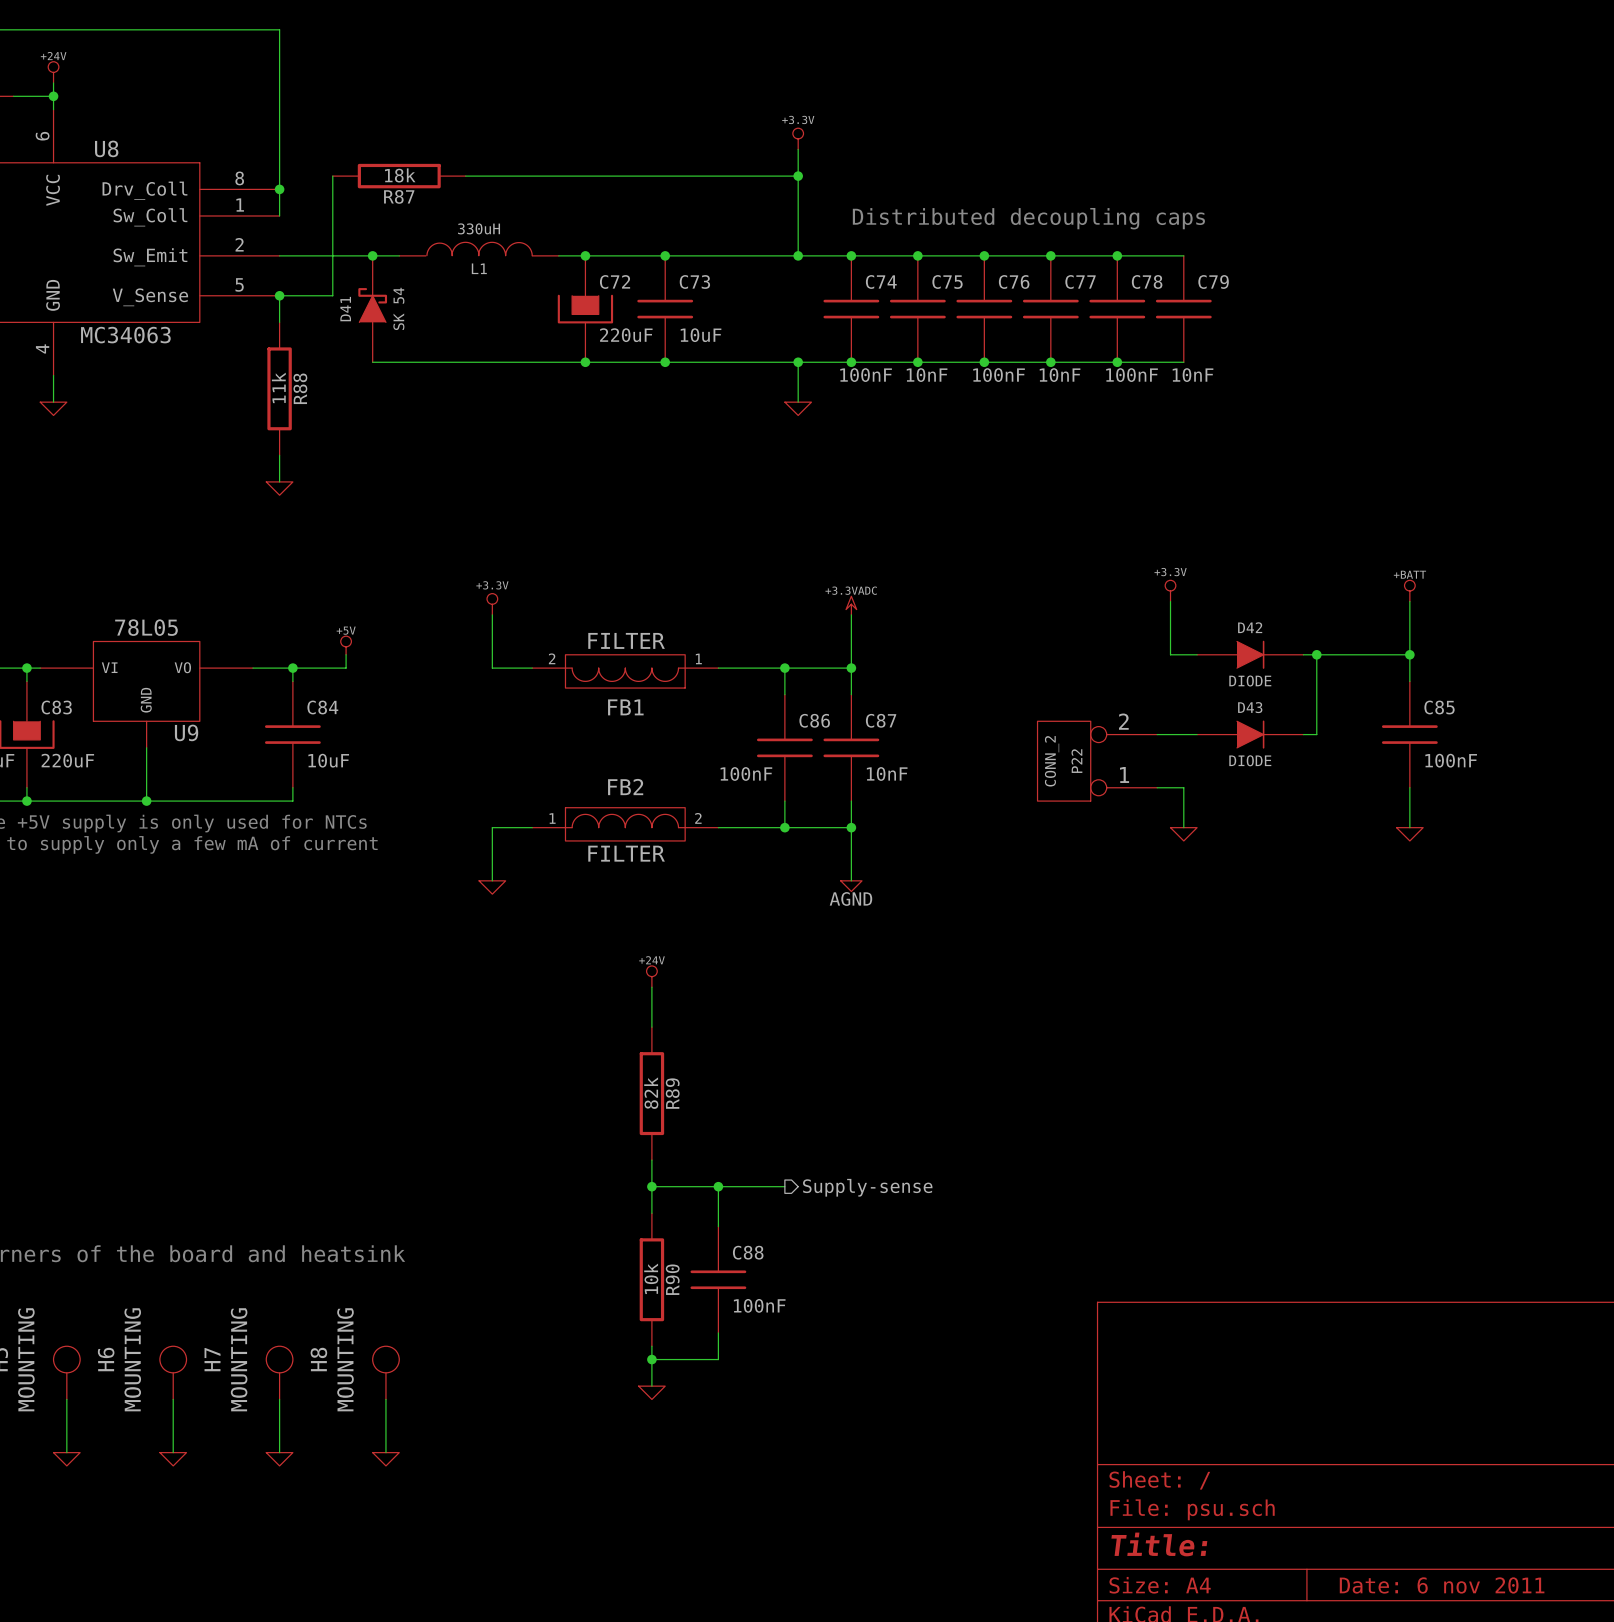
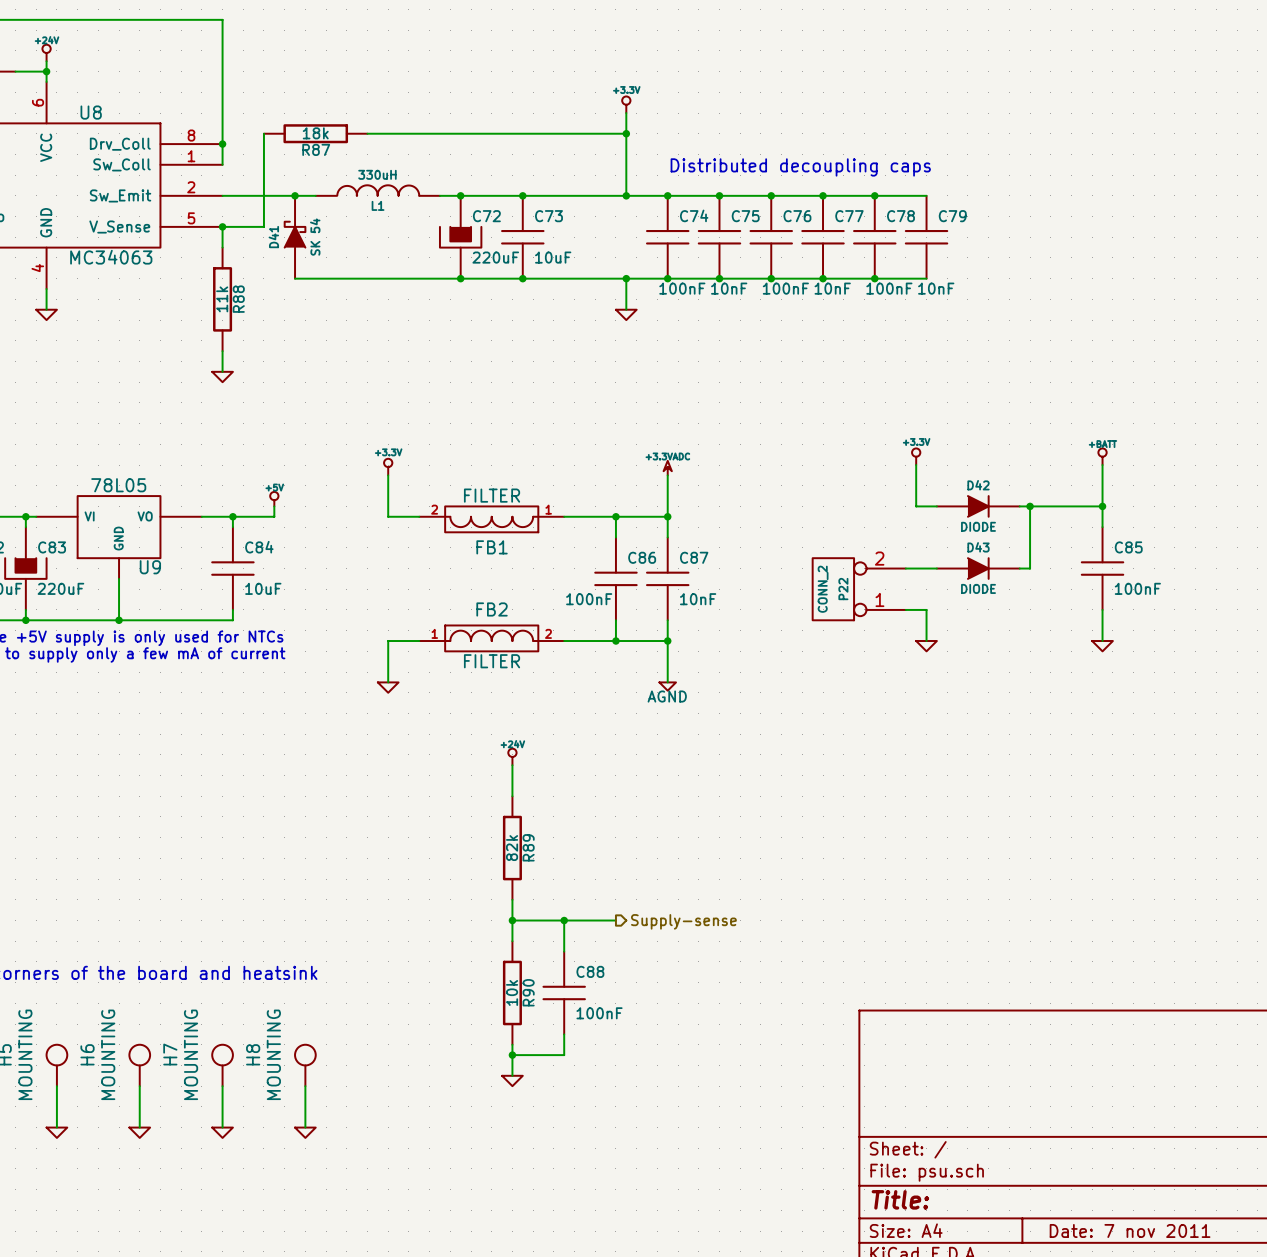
title block: Date: 6 nov 2011 (1442, 1585) -> Date: 7 nov 2011 (1130, 1230)

